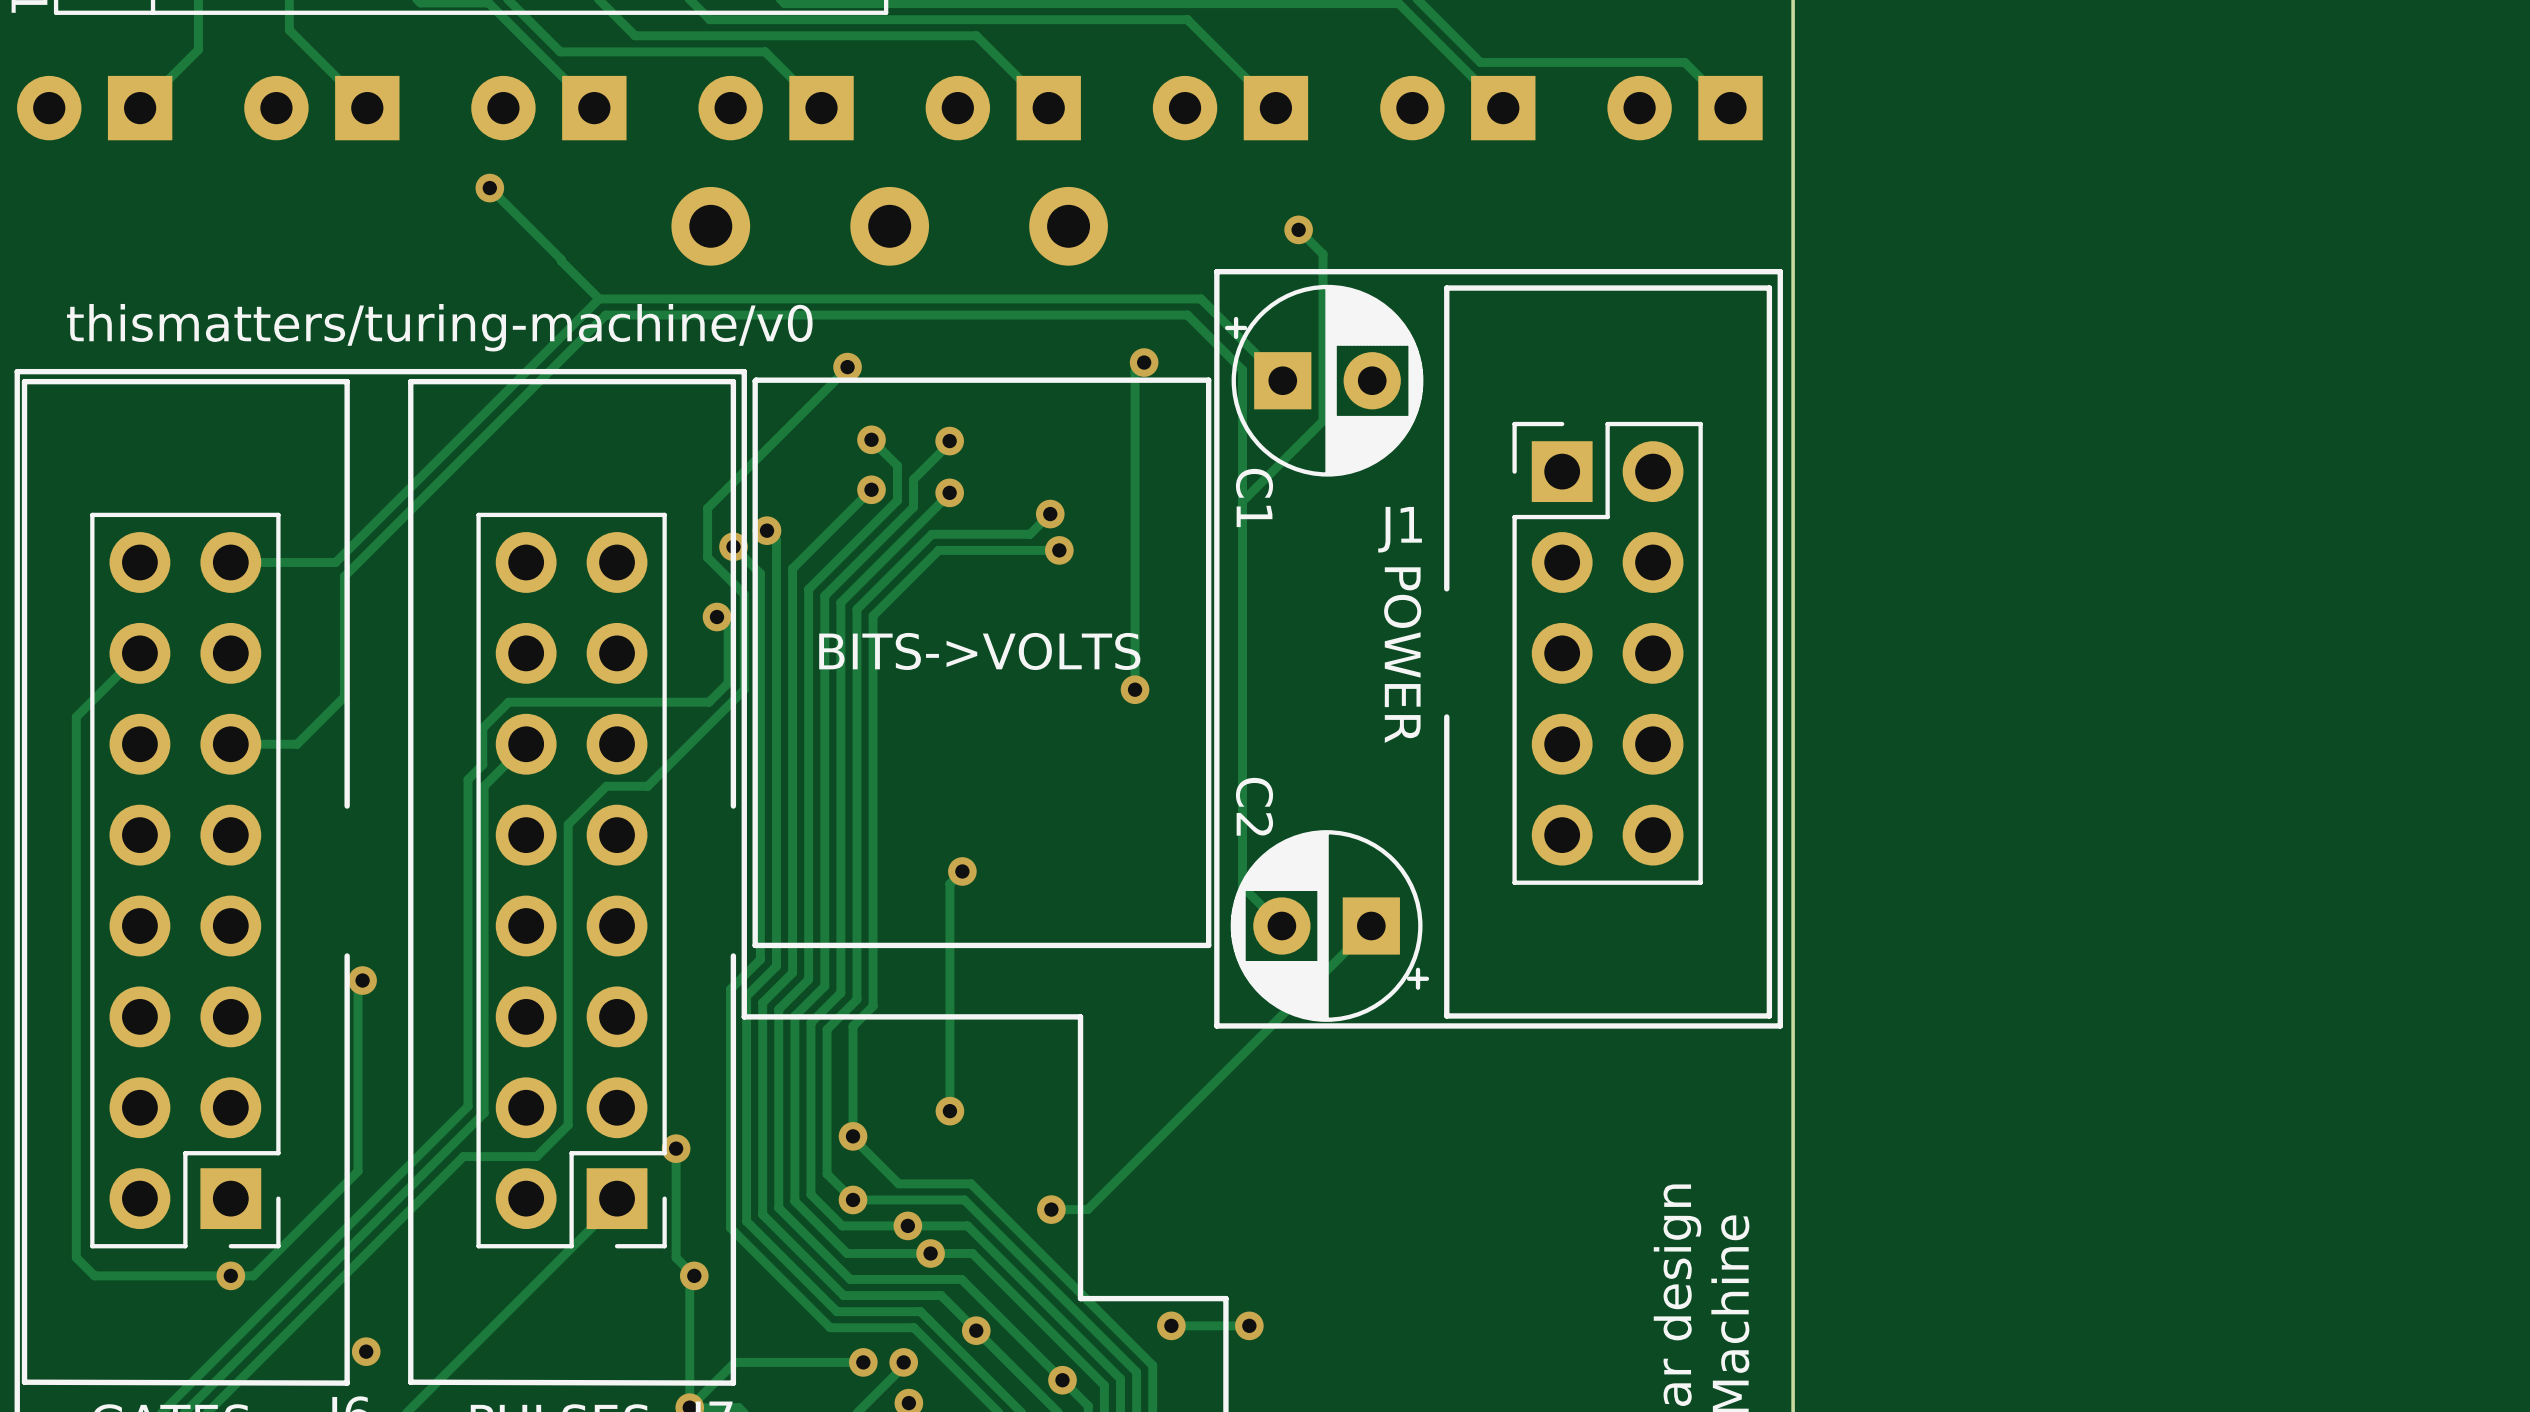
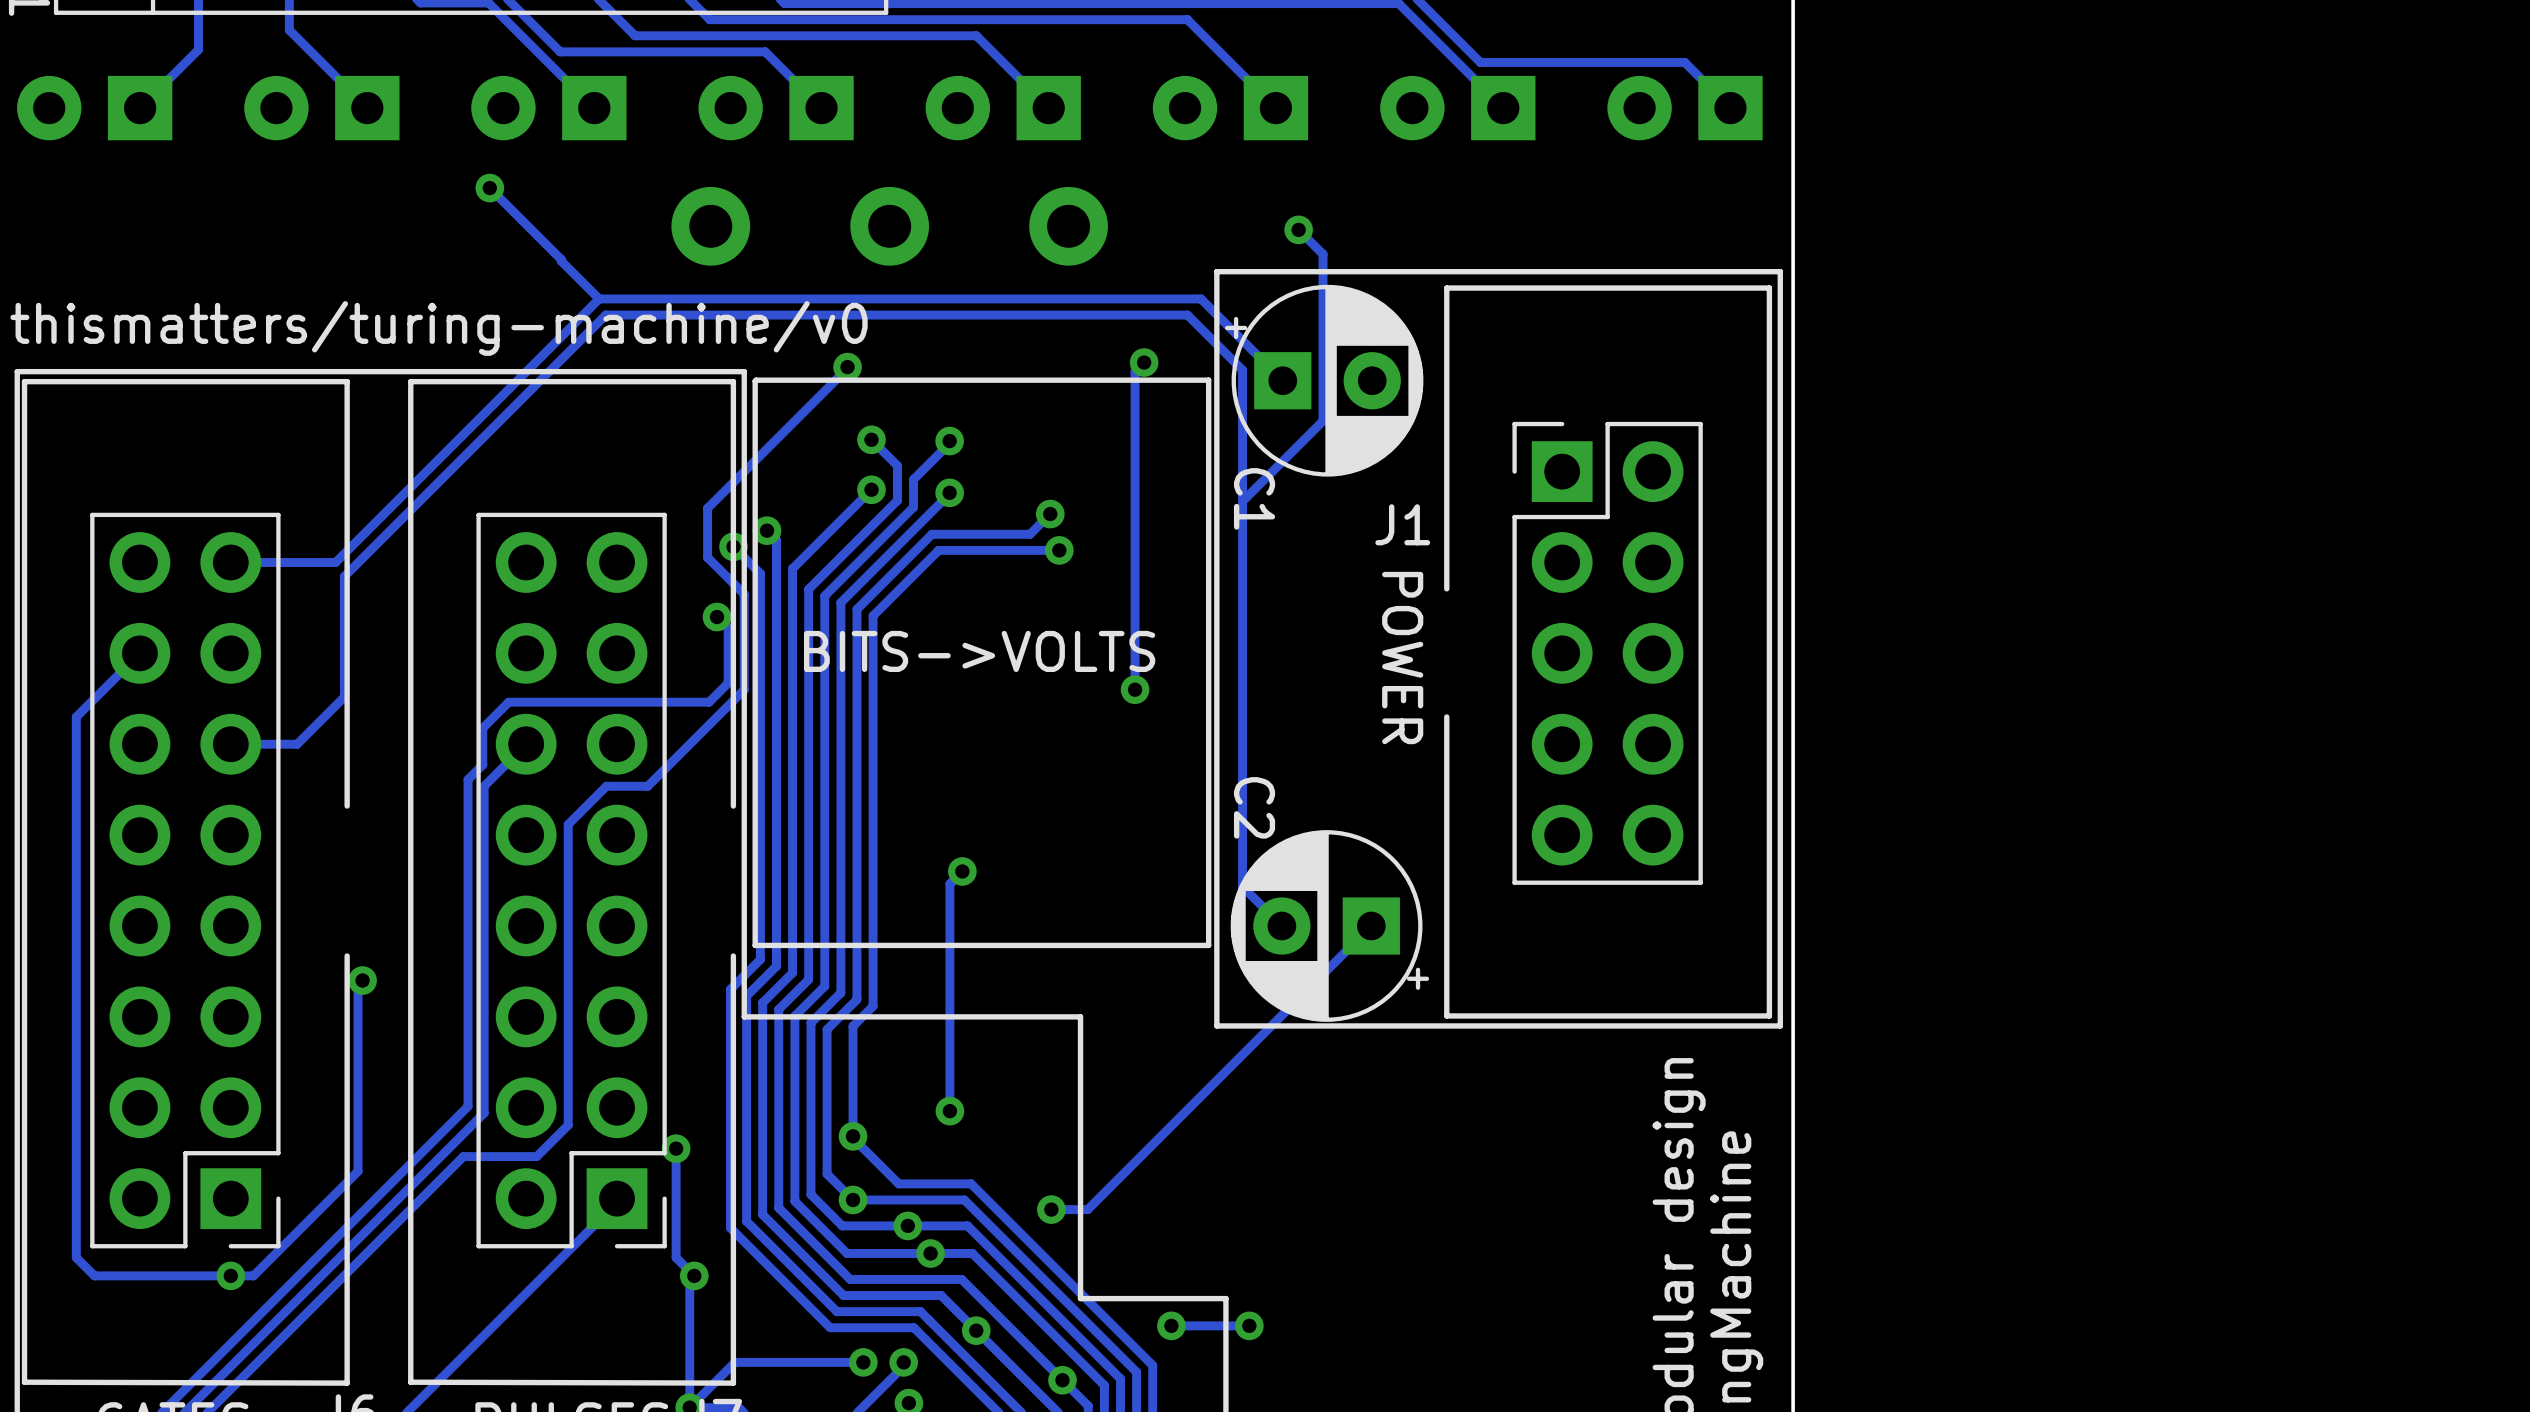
via: (366, 1351) -> none

